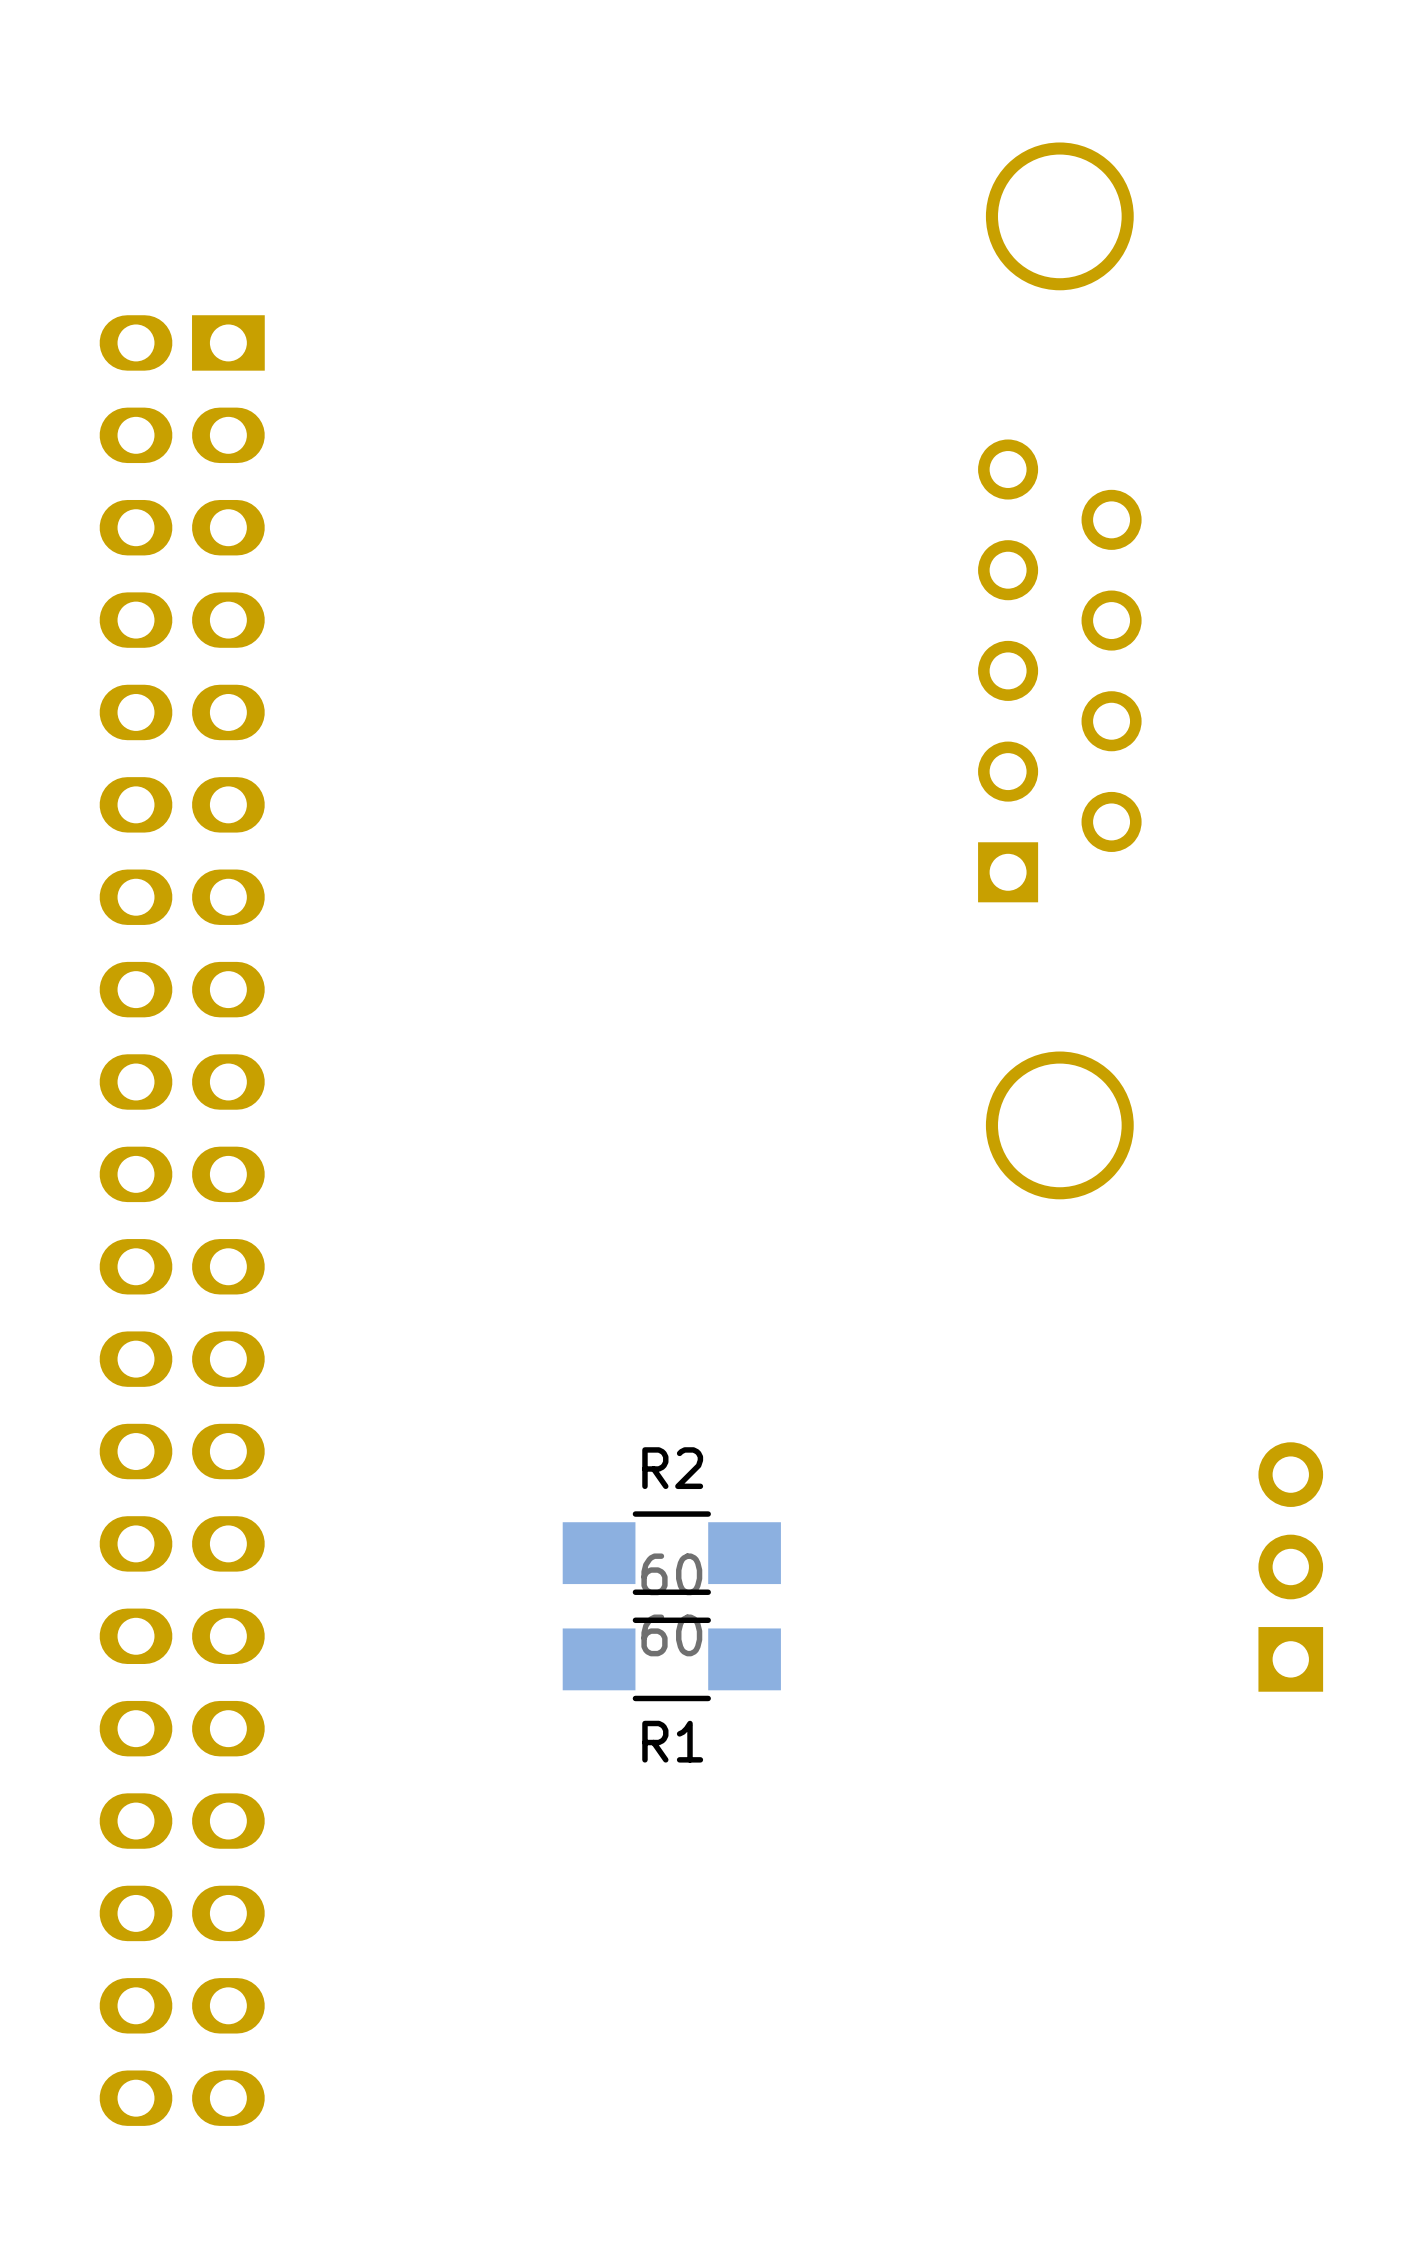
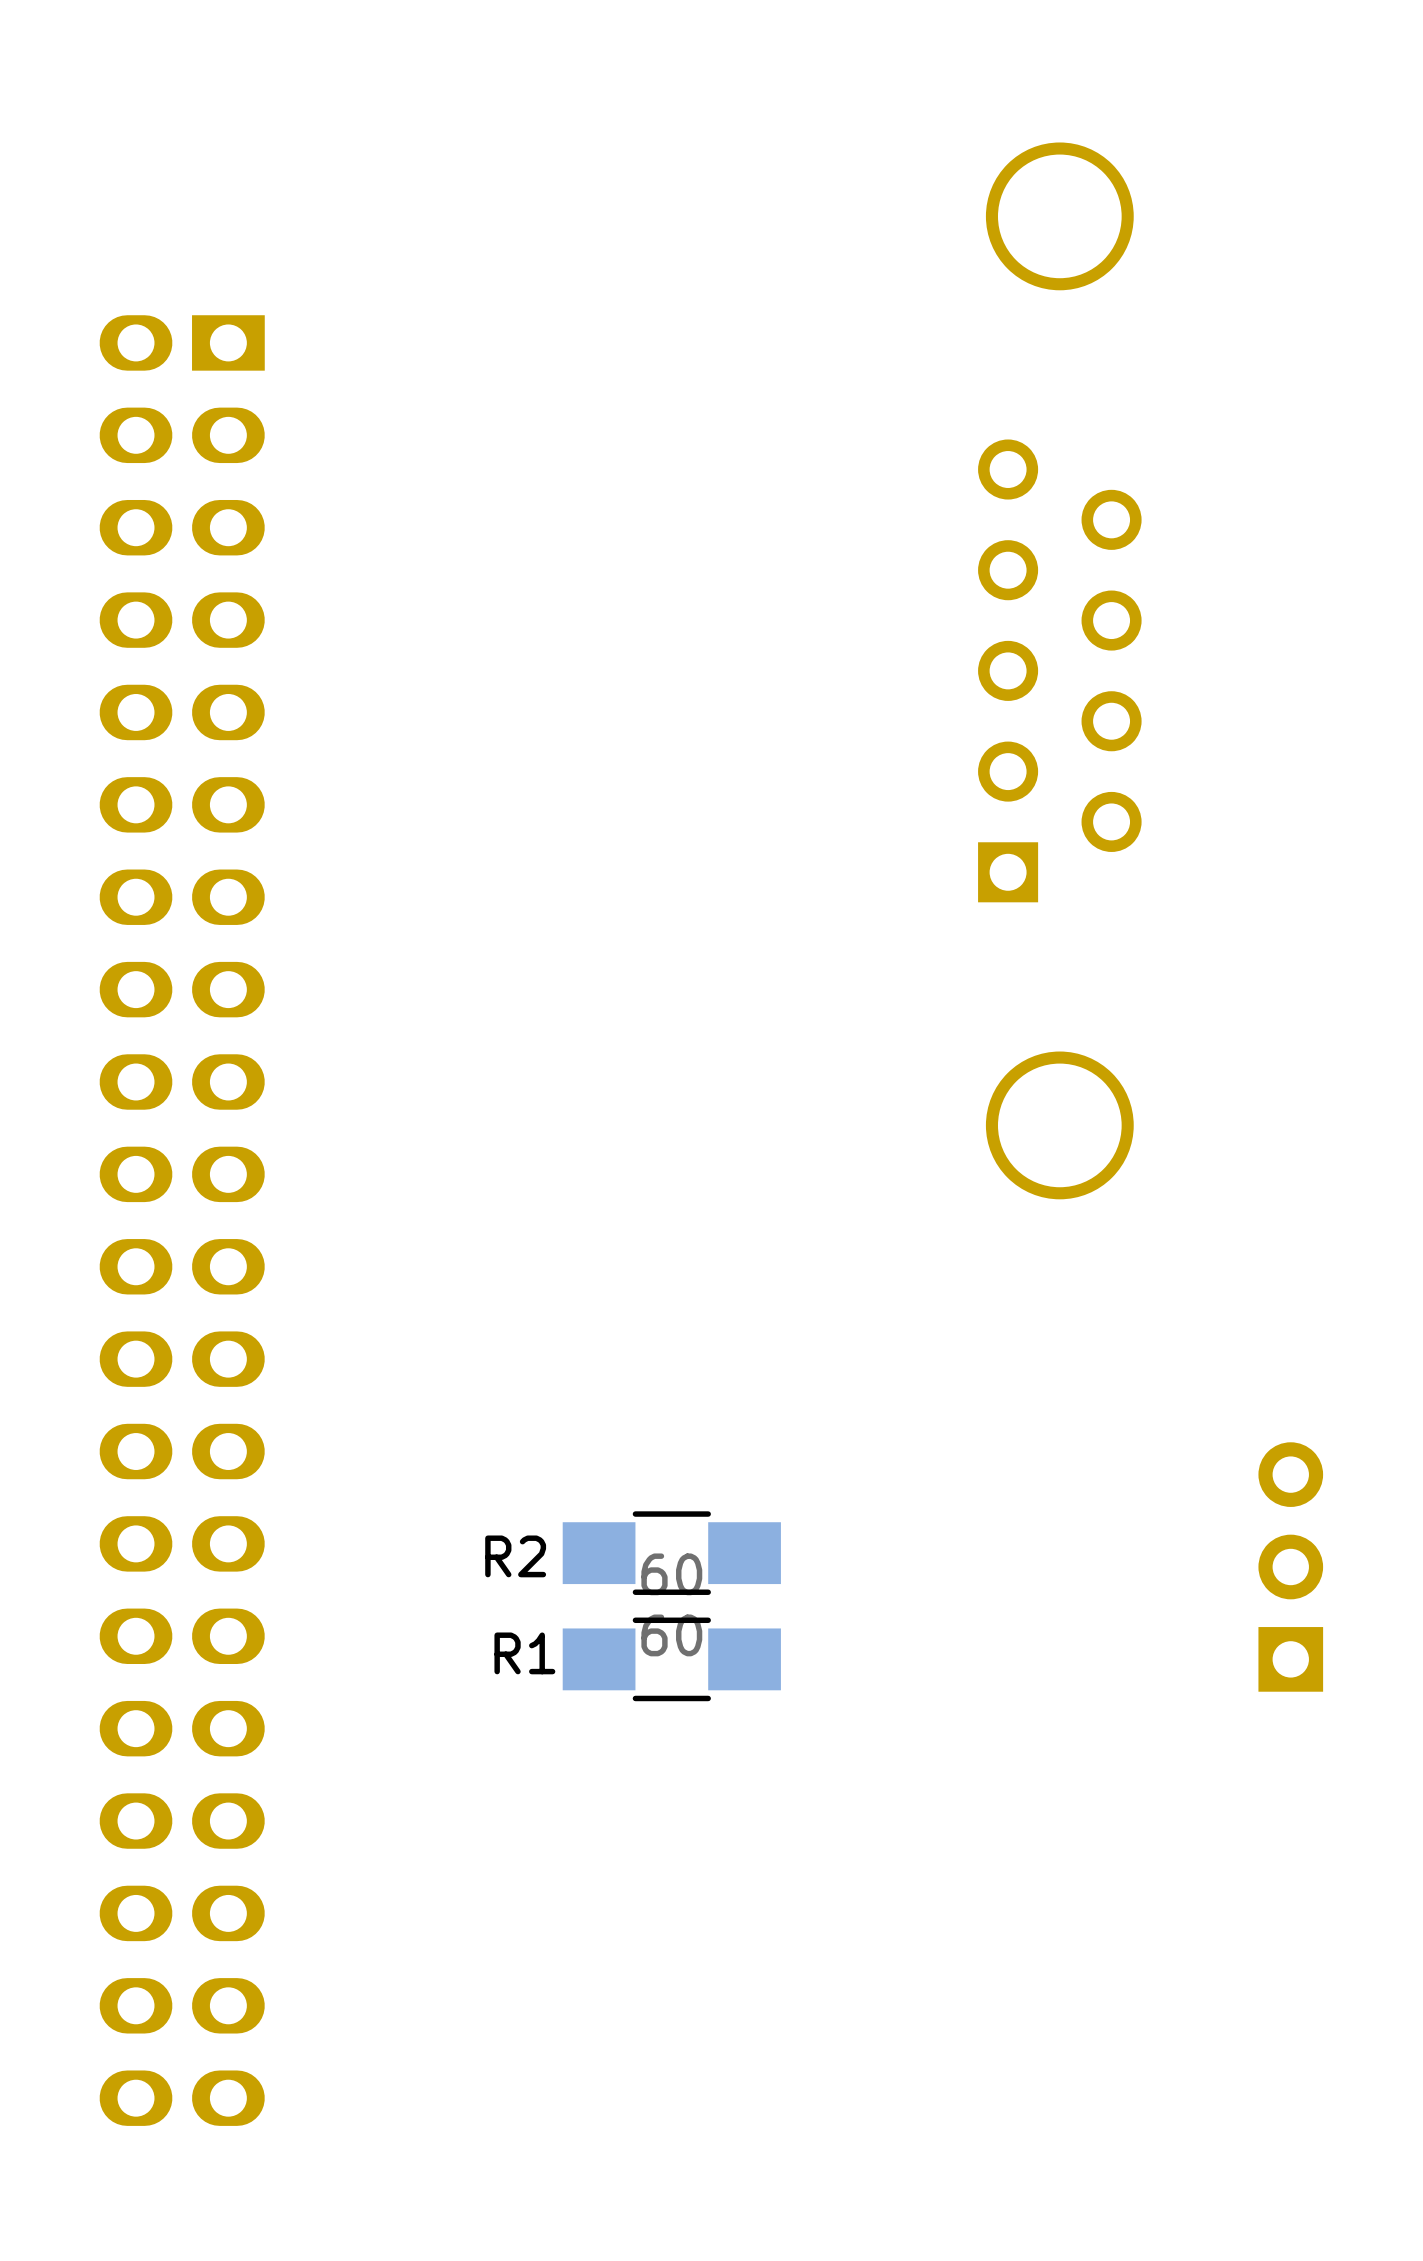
R2 name position: R2 (672, 1468) -> R2 (515, 1556)
R1 name position: R1 (672, 1741) -> R1 (524, 1653)

